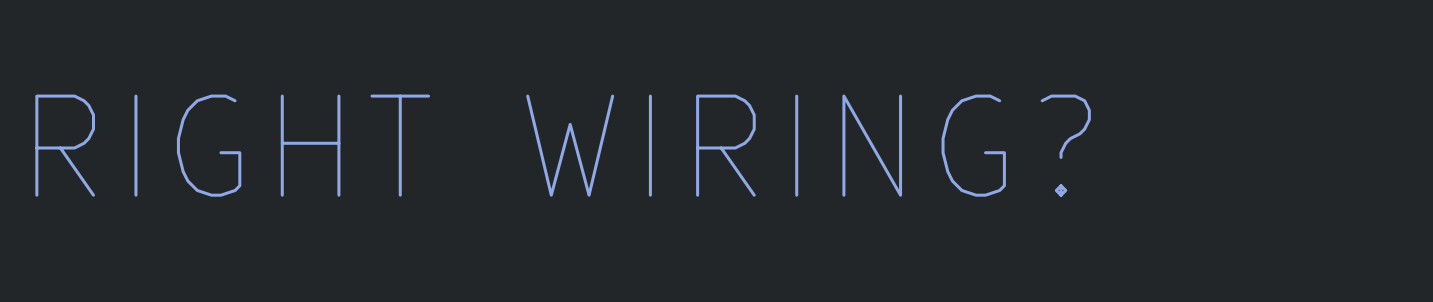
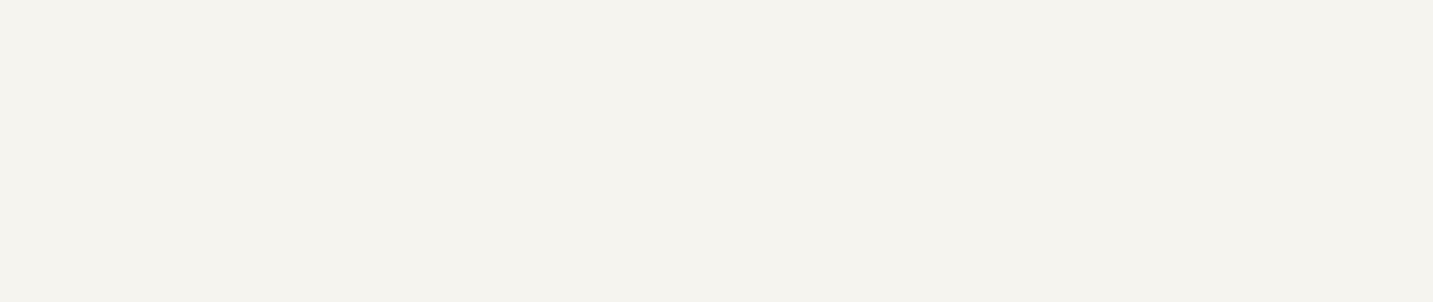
text: RIGHT WIRING? (563, 145) -> none

